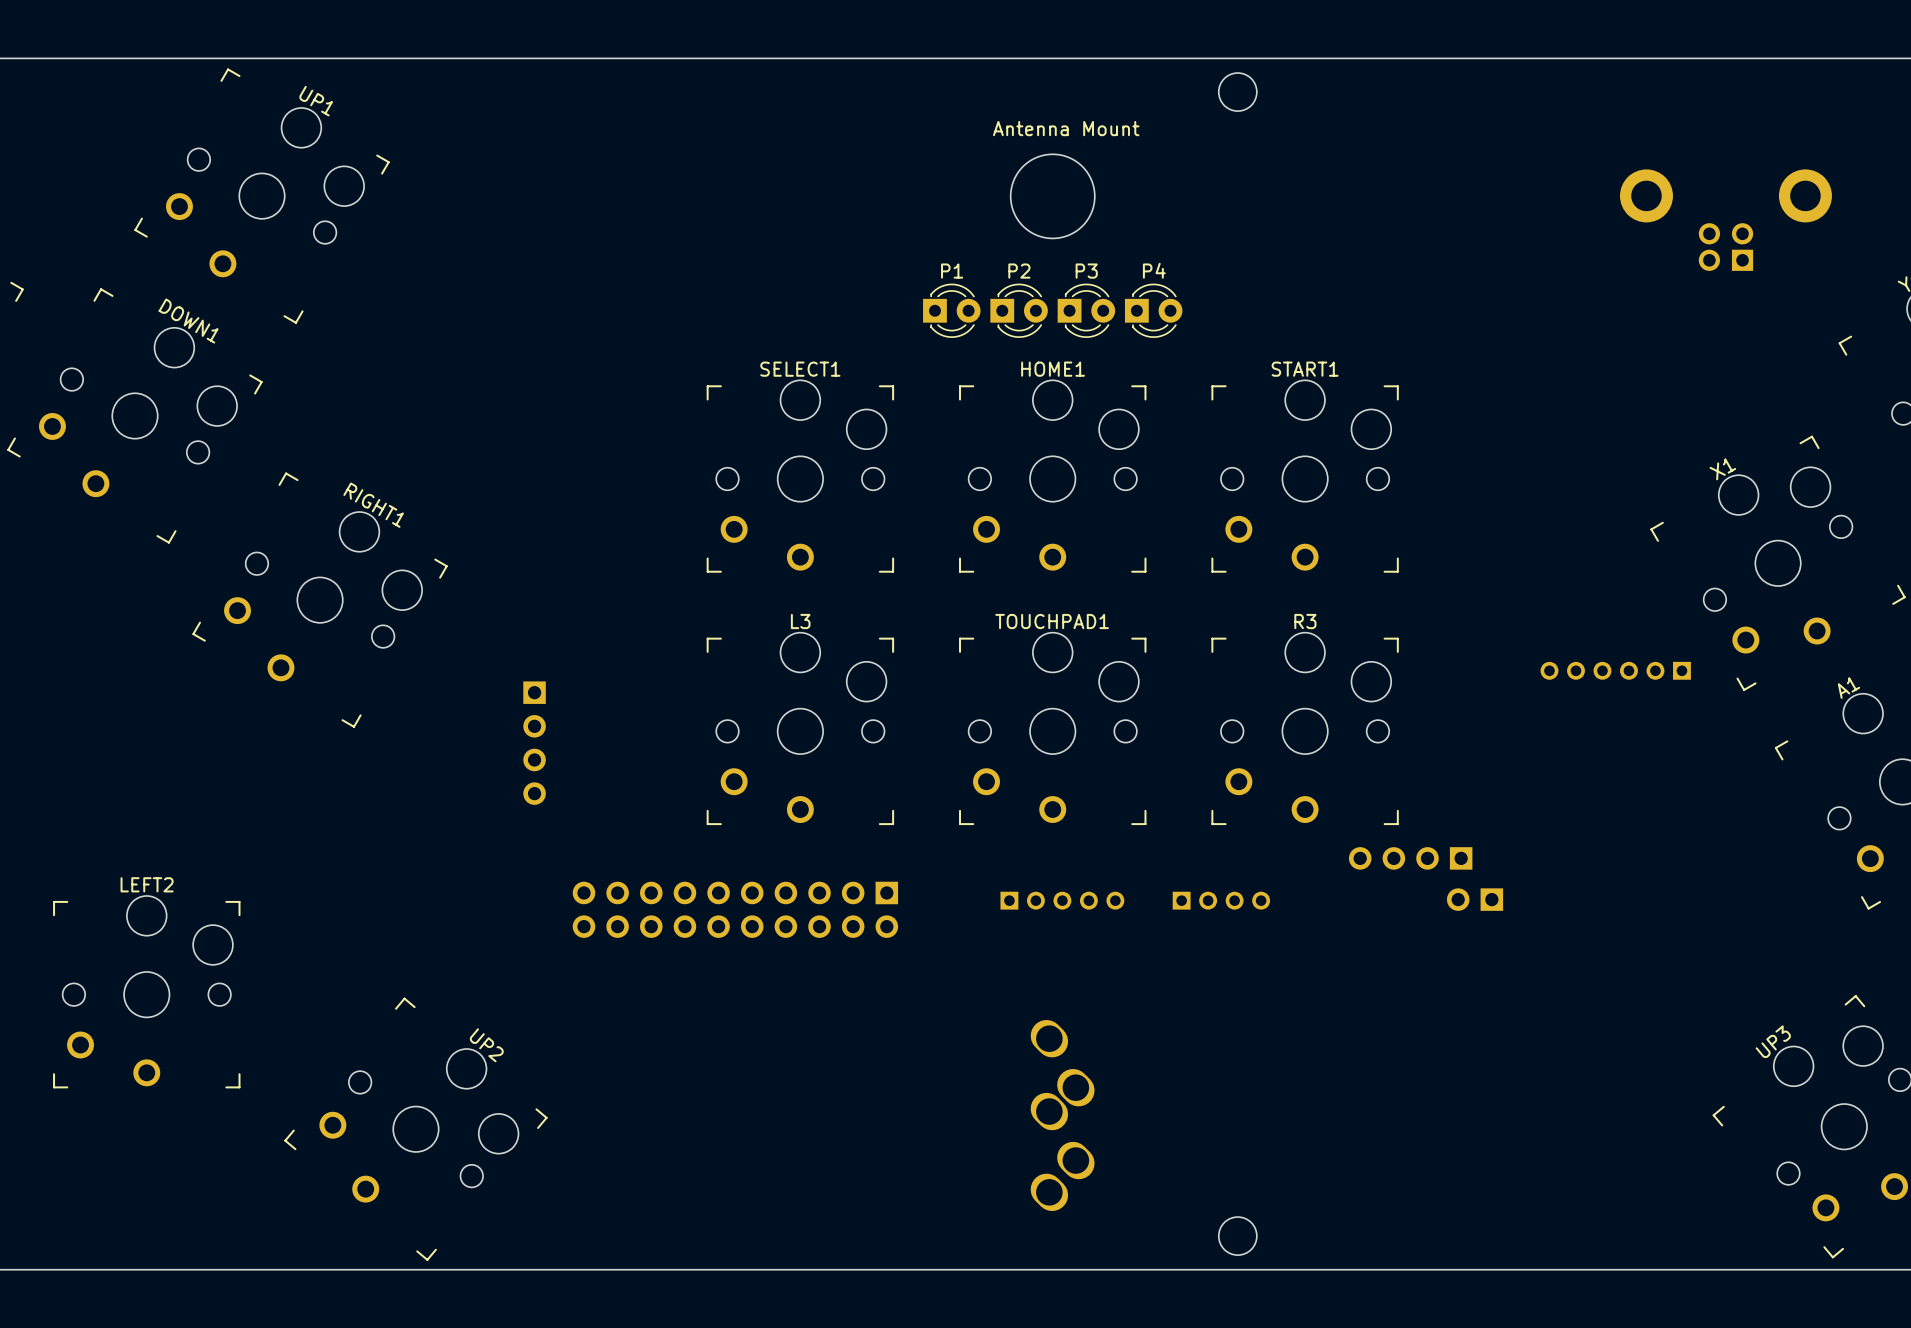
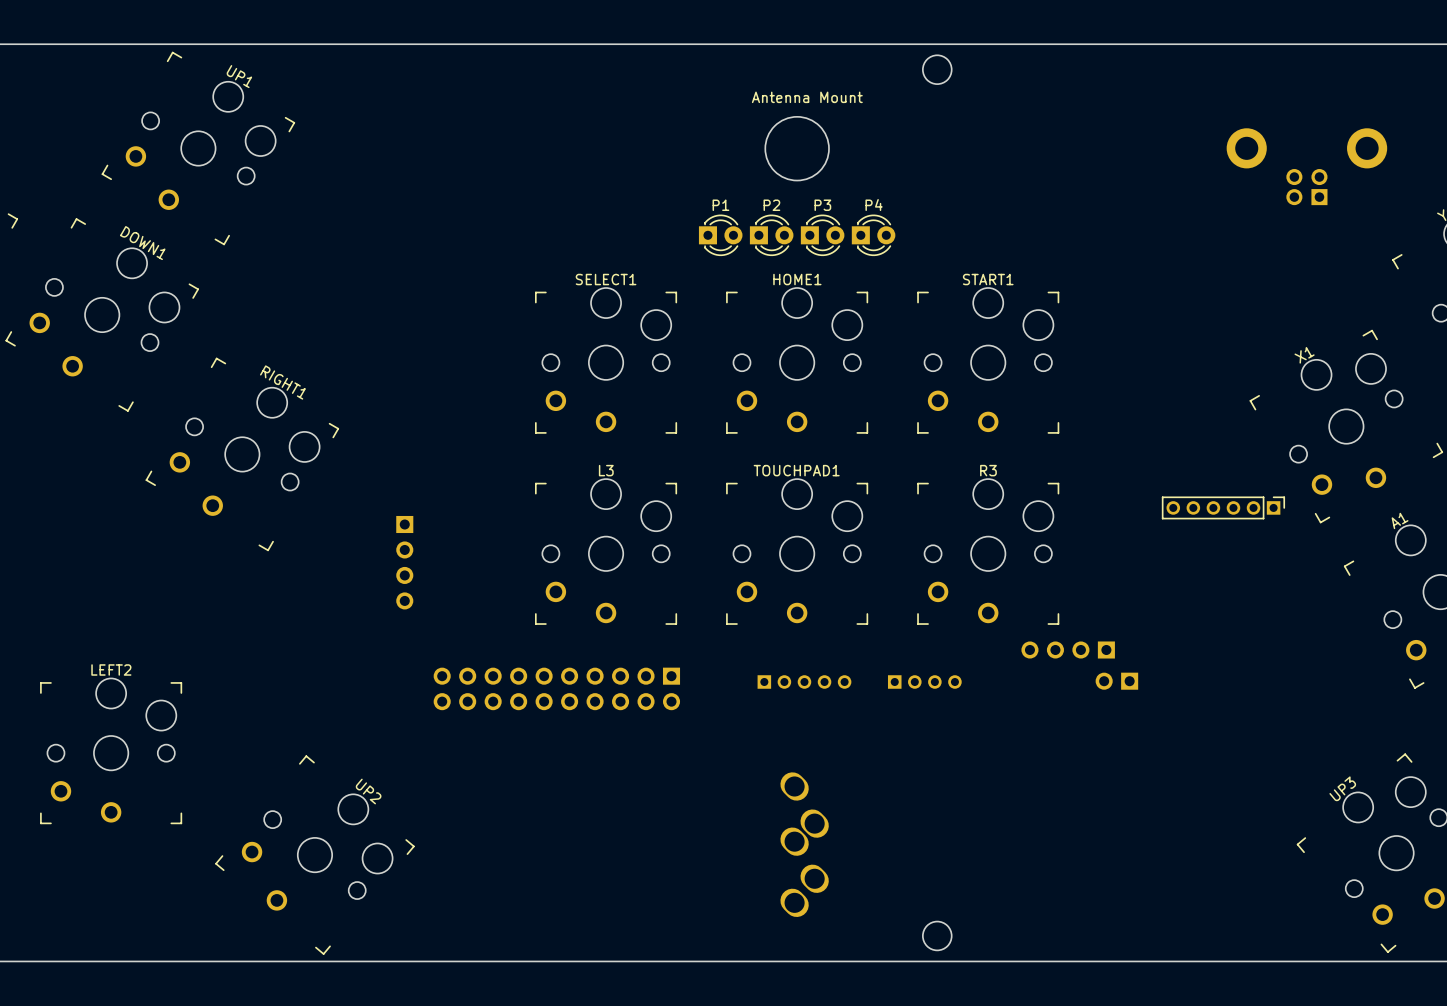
part side: bottom (1615, 670) -> top (1223, 507)

